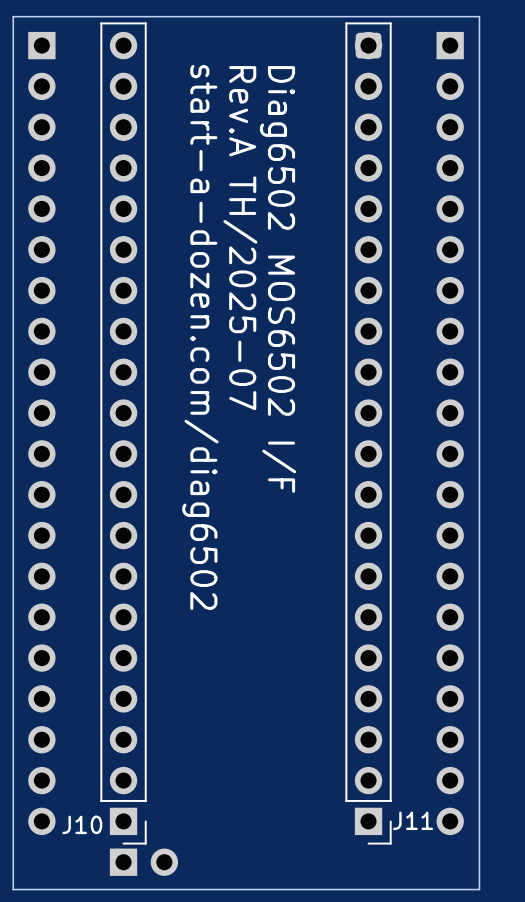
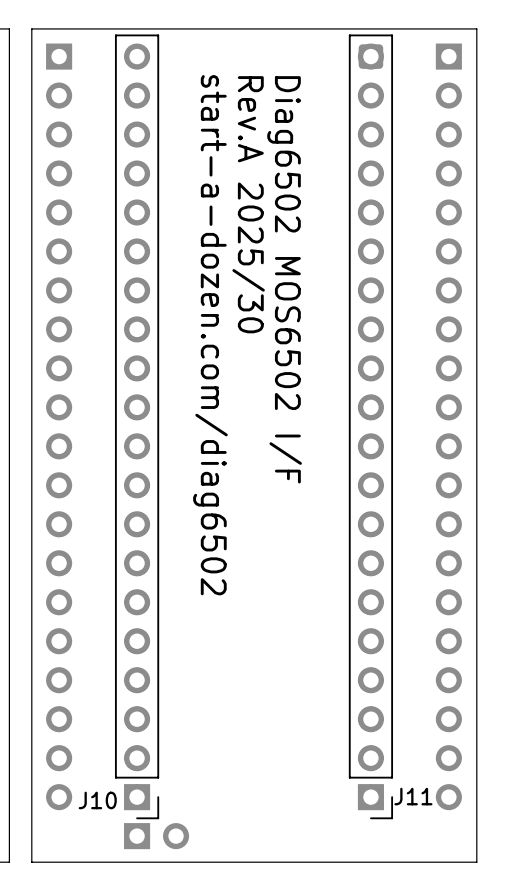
text: Rev.A TH/2025-07 (240, 238) -> Rev.A 2025/30 (248, 204)

